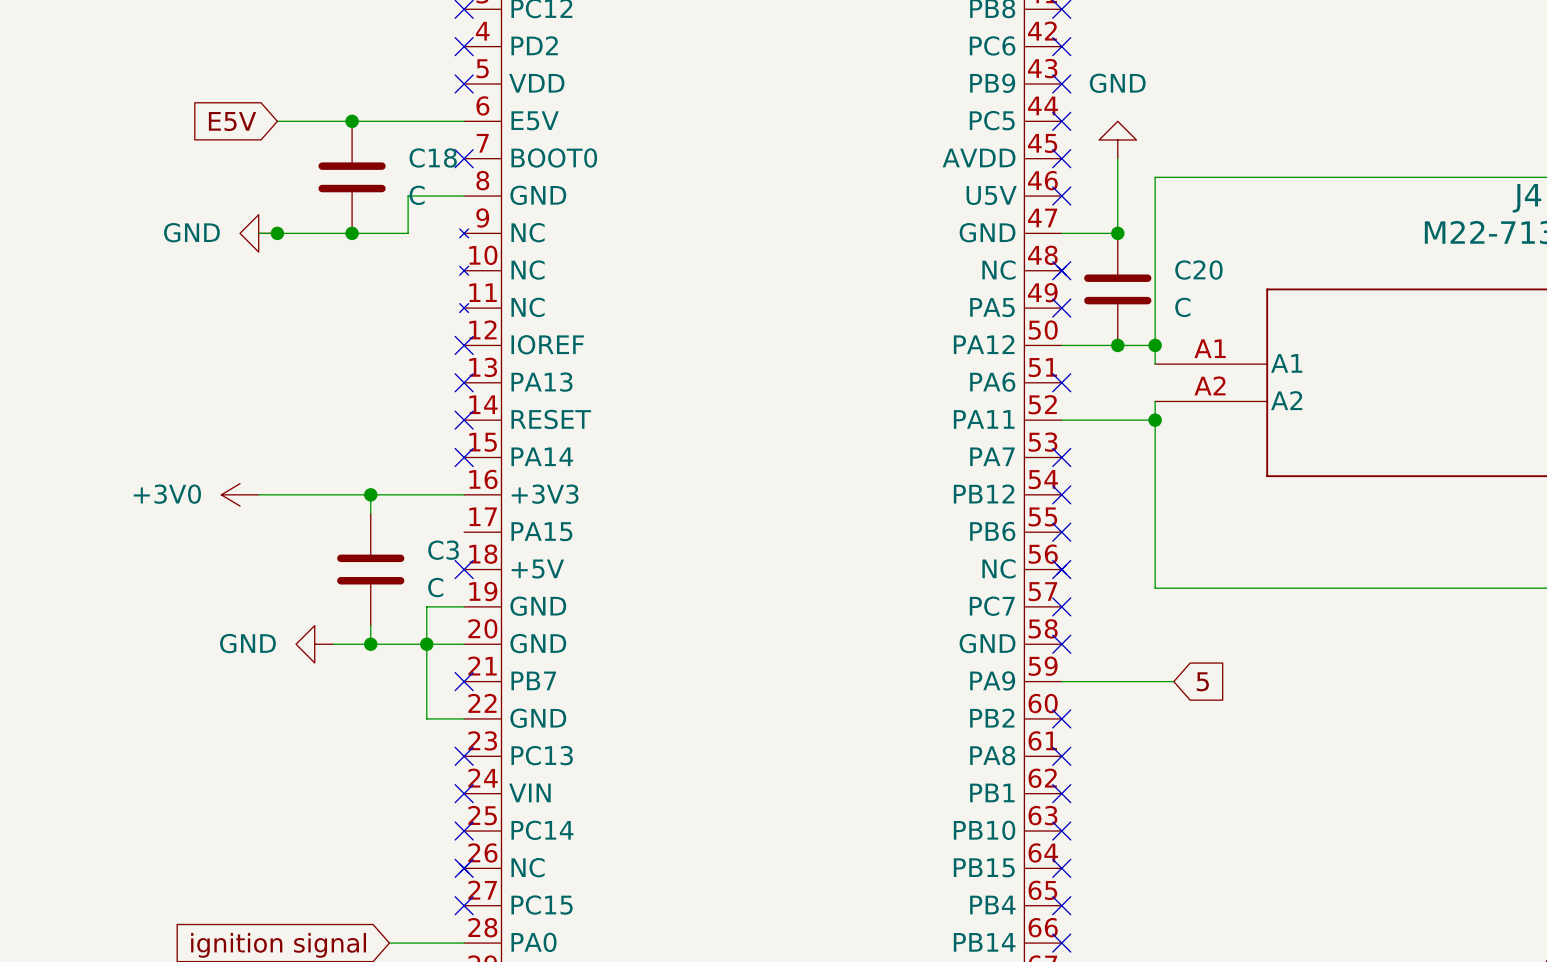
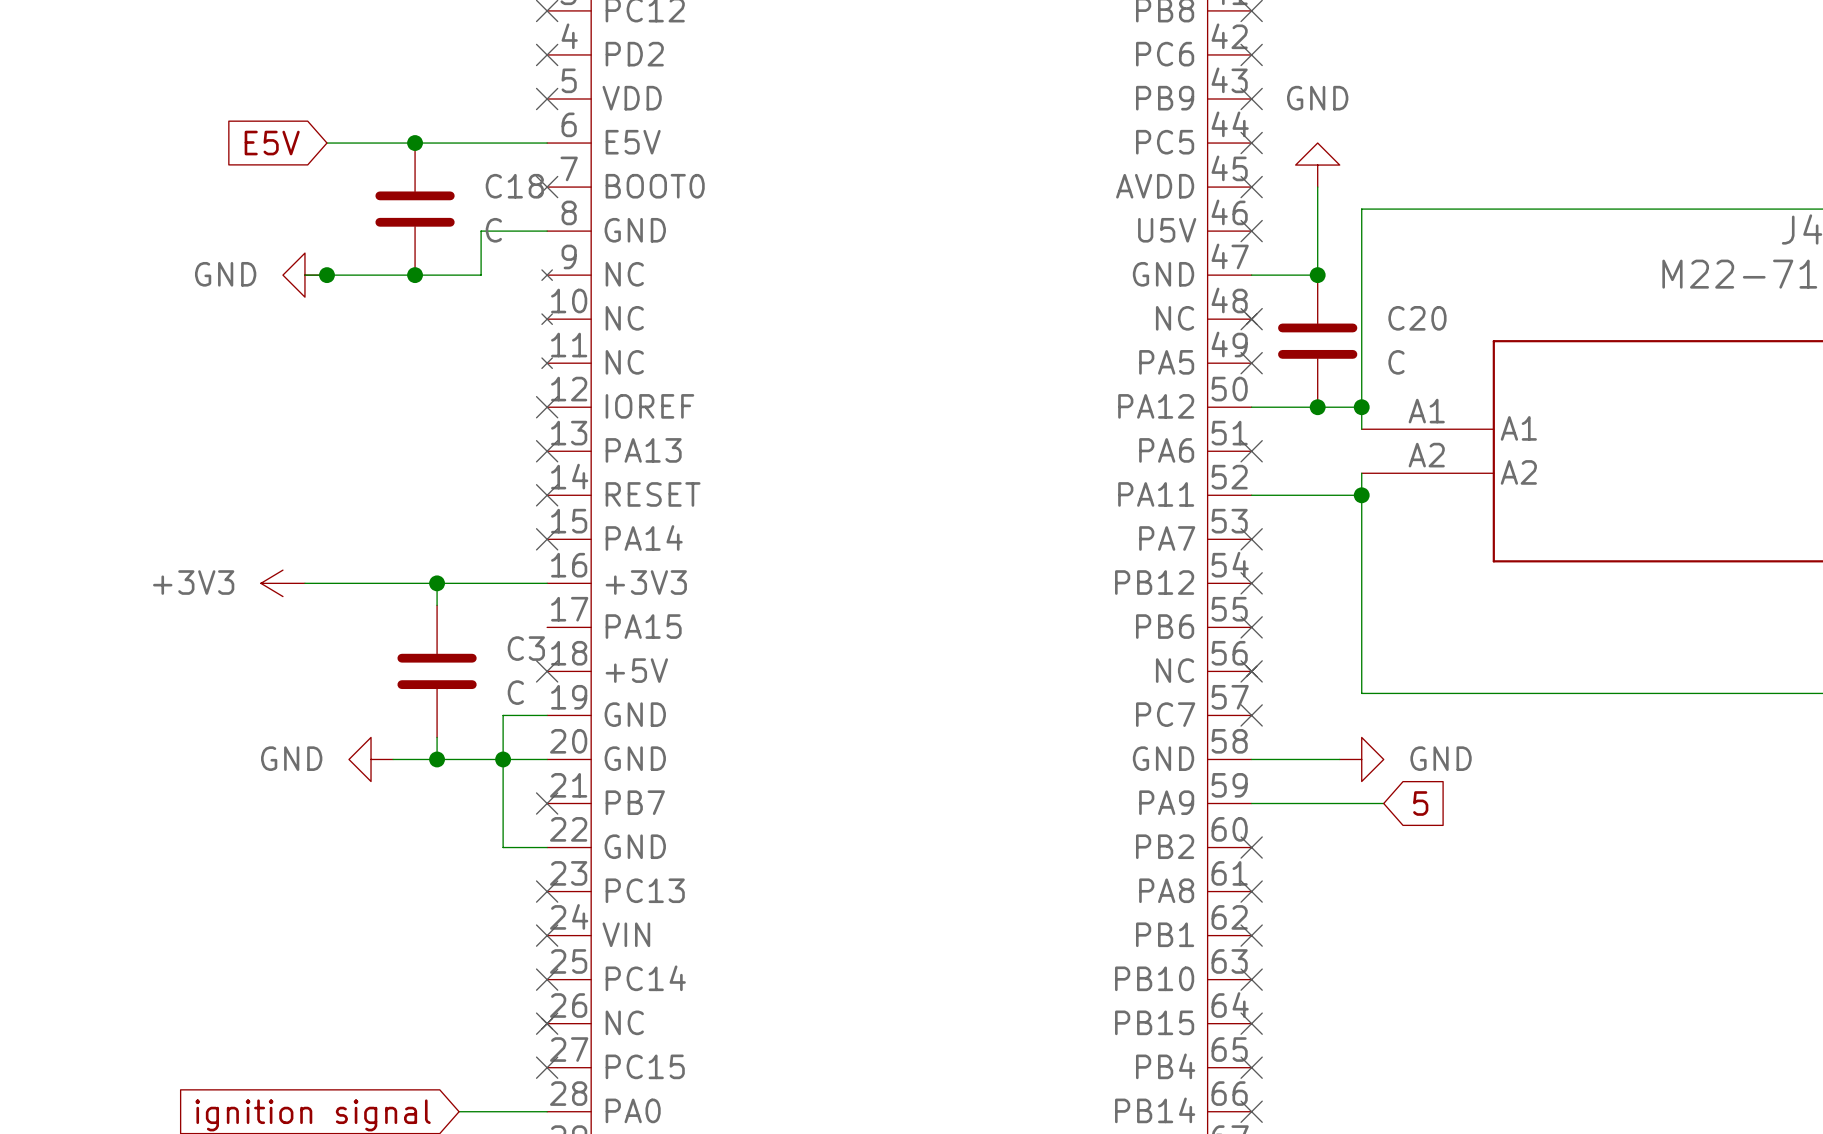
power symbol: +3V0 (240, 494) -> +3V3 (282, 583)
wire: none -> (1251, 759) (1339, 759)
no-connect mark: (1061, 644) -> none
power symbol: none -> GND (1361, 759)

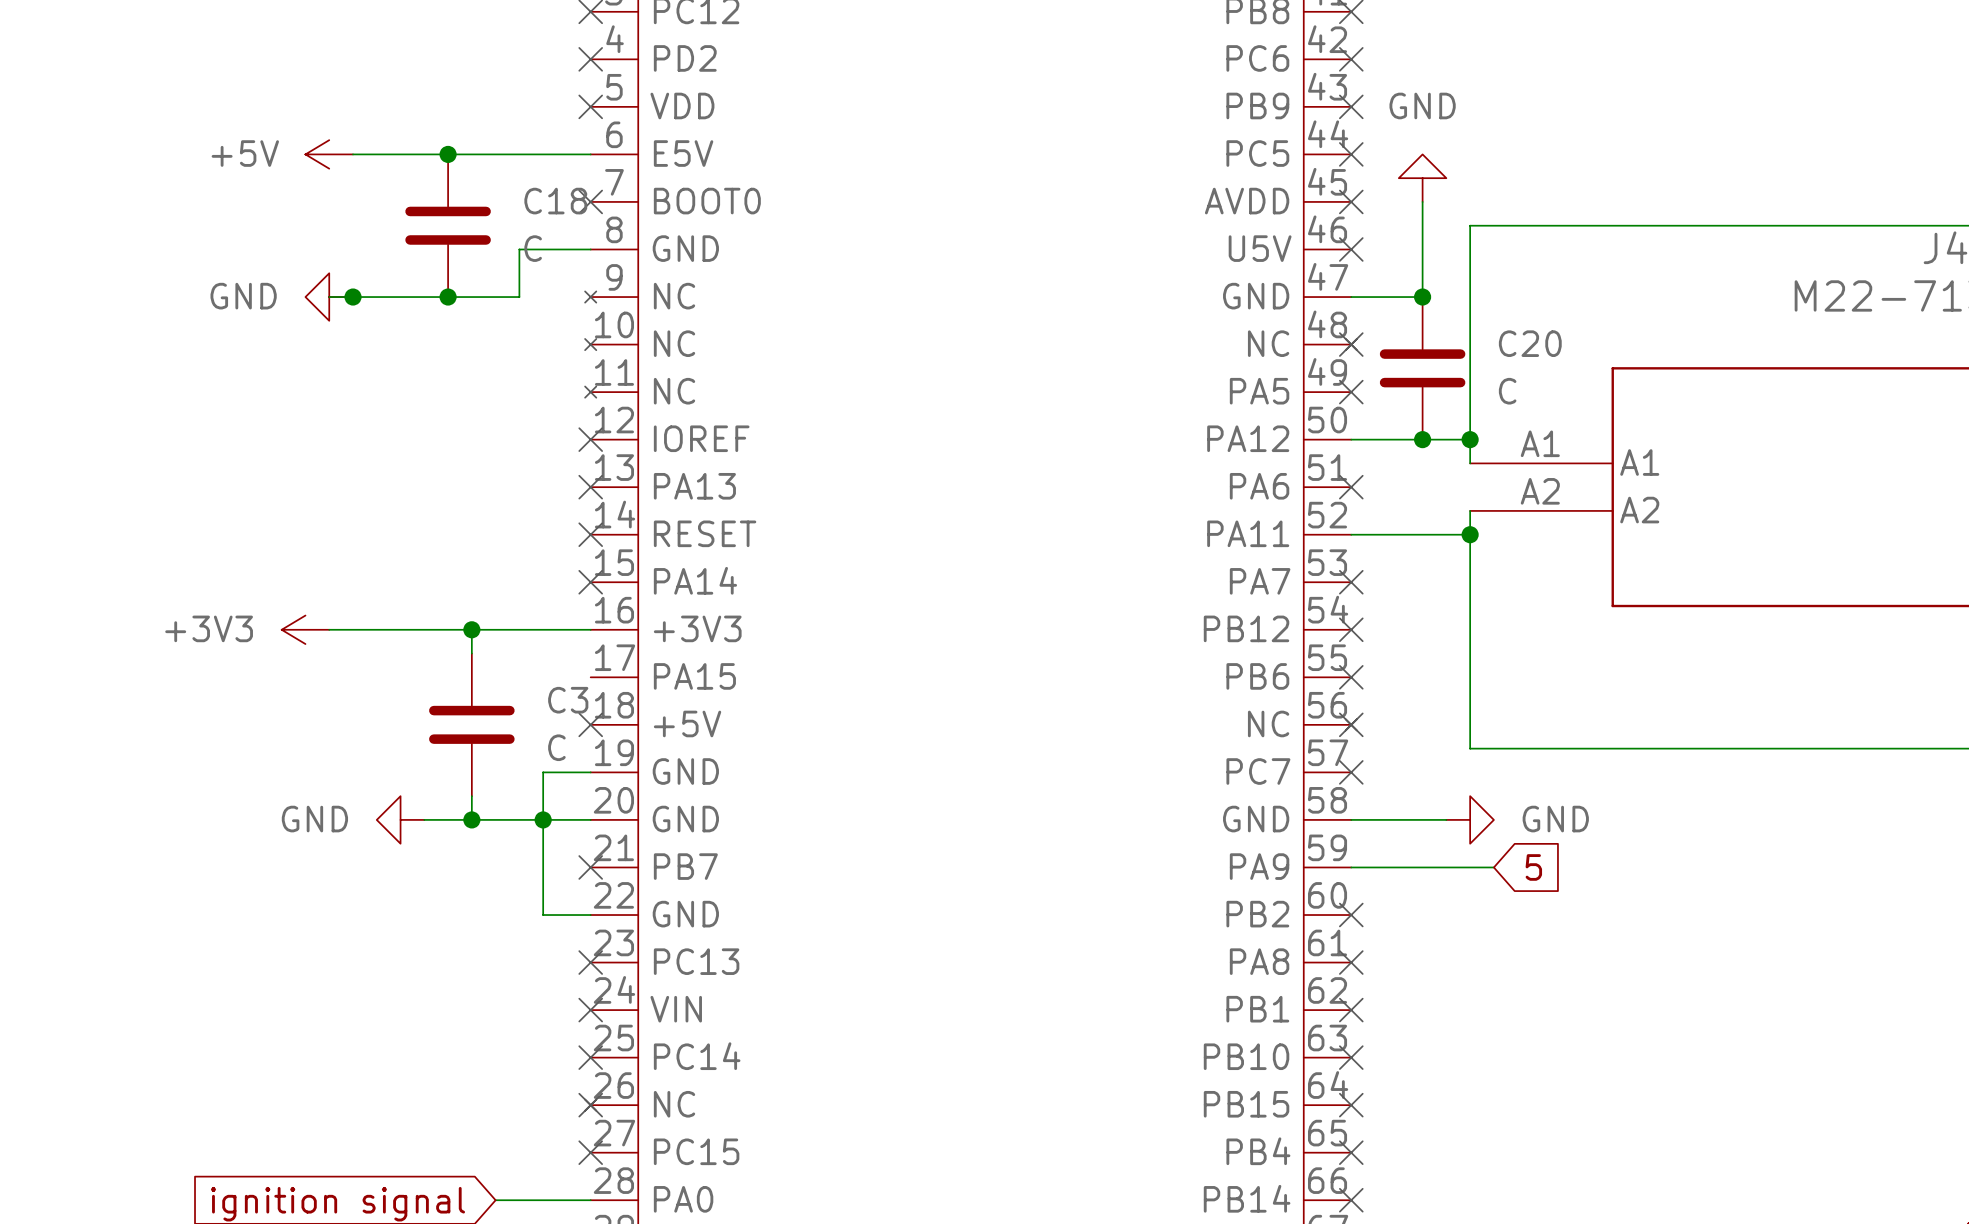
global label: E5V (272, 143) -> none
power symbol: none -> +5V (329, 154)

